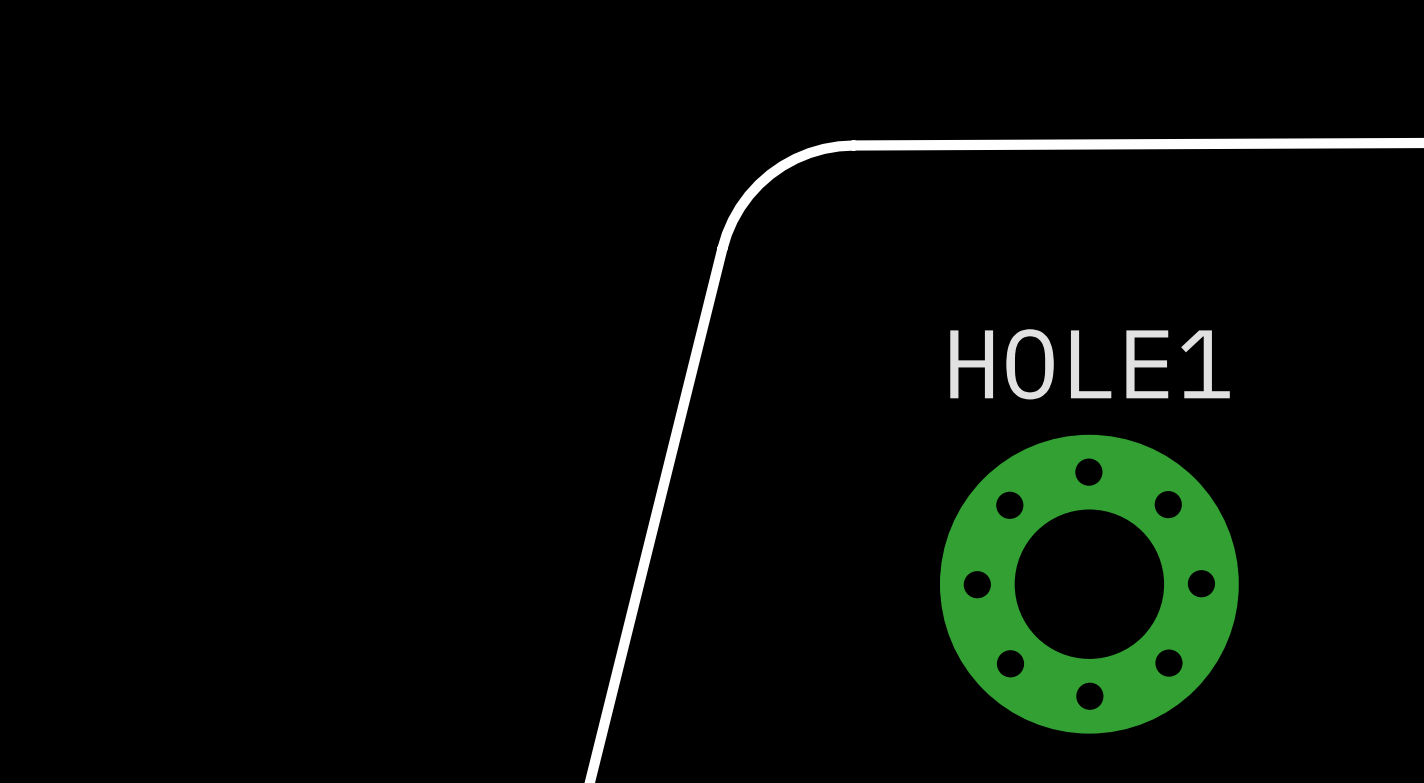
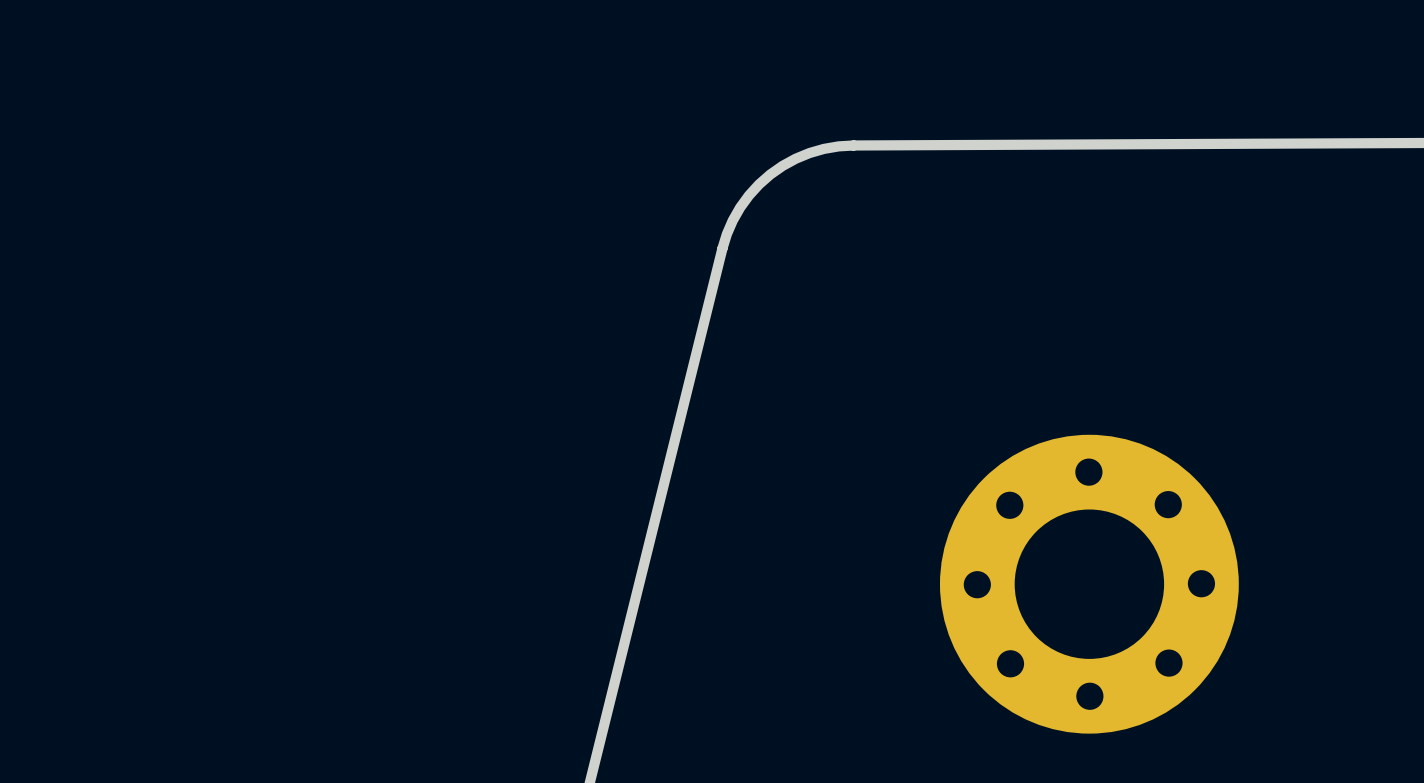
HOLE1 name: HOLE1 (1090, 364) -> none

